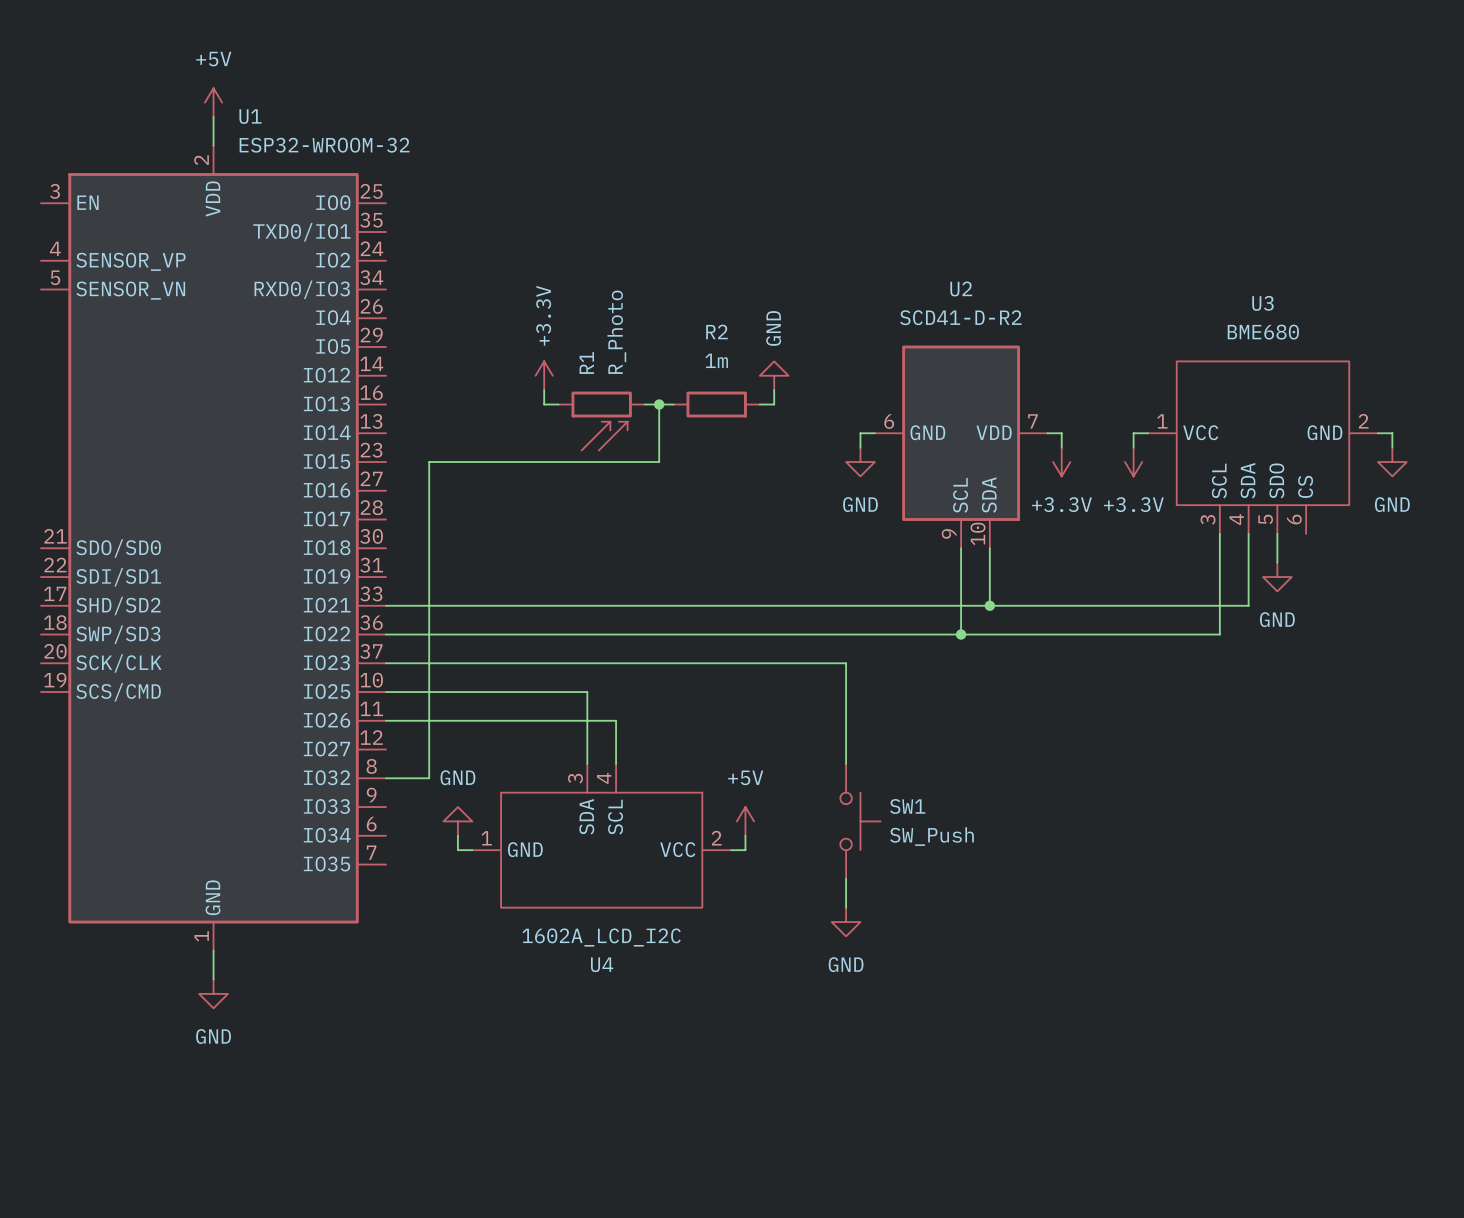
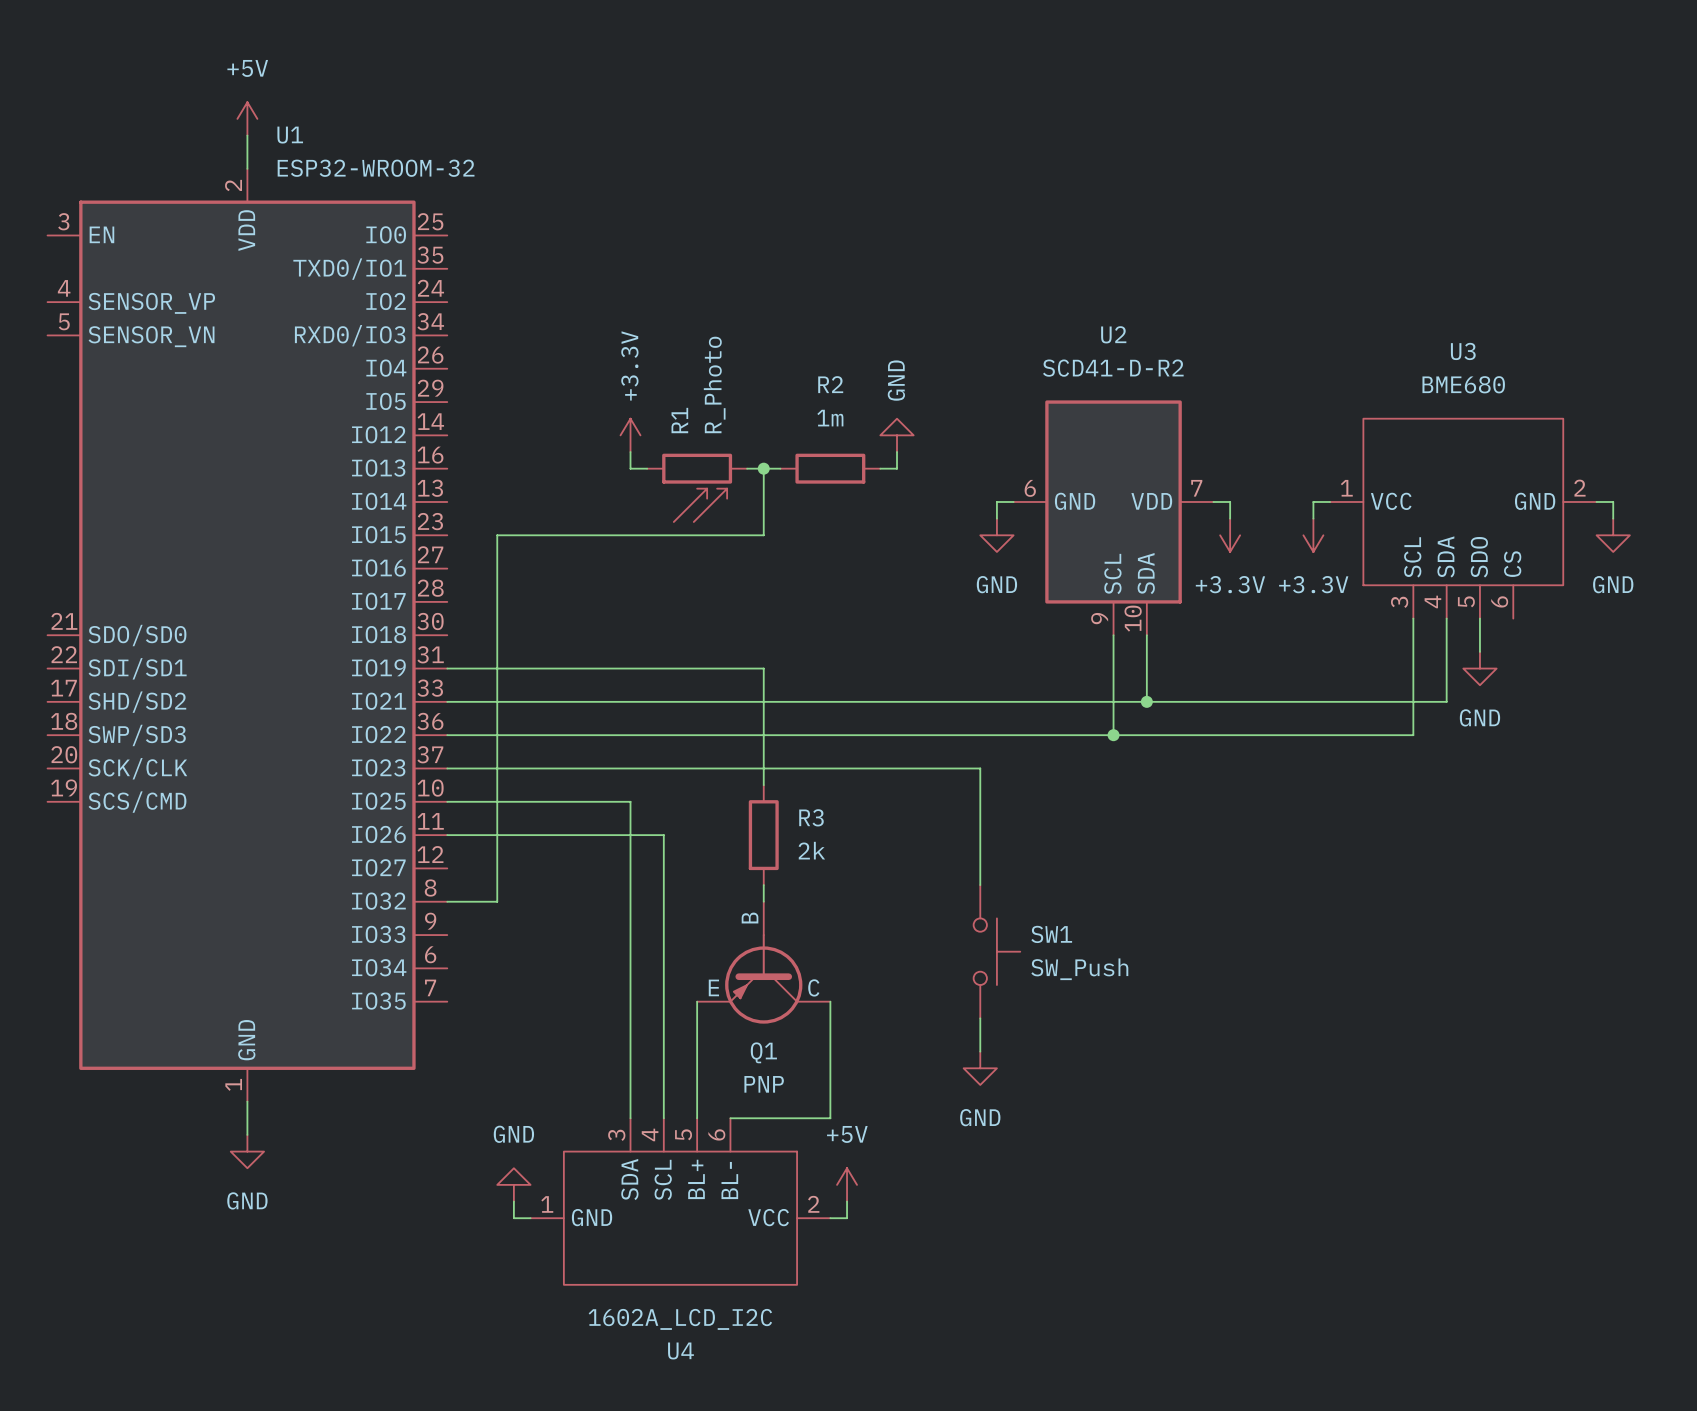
wire: none -> (447, 668) (763, 668) (763, 785)
wire: (544, 692) (587, 692) (587, 763) -> (630, 801) (630, 1118)
wire: (572, 720) (616, 720) (616, 763) -> (663, 835) (663, 1118)
R3: none -> 2k (763, 835)
U4 symbol: [472, 763, 732, 908] -> [530, 1118, 831, 1285]
wire: none -> (763, 885) (763, 901)
power symbol position: GND (457, 821) -> GND (513, 1184)
power symbol position: +5V (745, 821) -> +5V (847, 1184)
Q1: none -> PNP (763, 962)
wire: (457, 835) (457, 850) (472, 850) -> (513, 1201) (513, 1218) (530, 1218)
wire: (745, 835) (745, 850) (731, 850) -> (847, 1201) (847, 1218) (830, 1218)
wire: none -> (697, 1001) (697, 1118)
wire: none -> (830, 1001) (830, 1118) (730, 1118)

